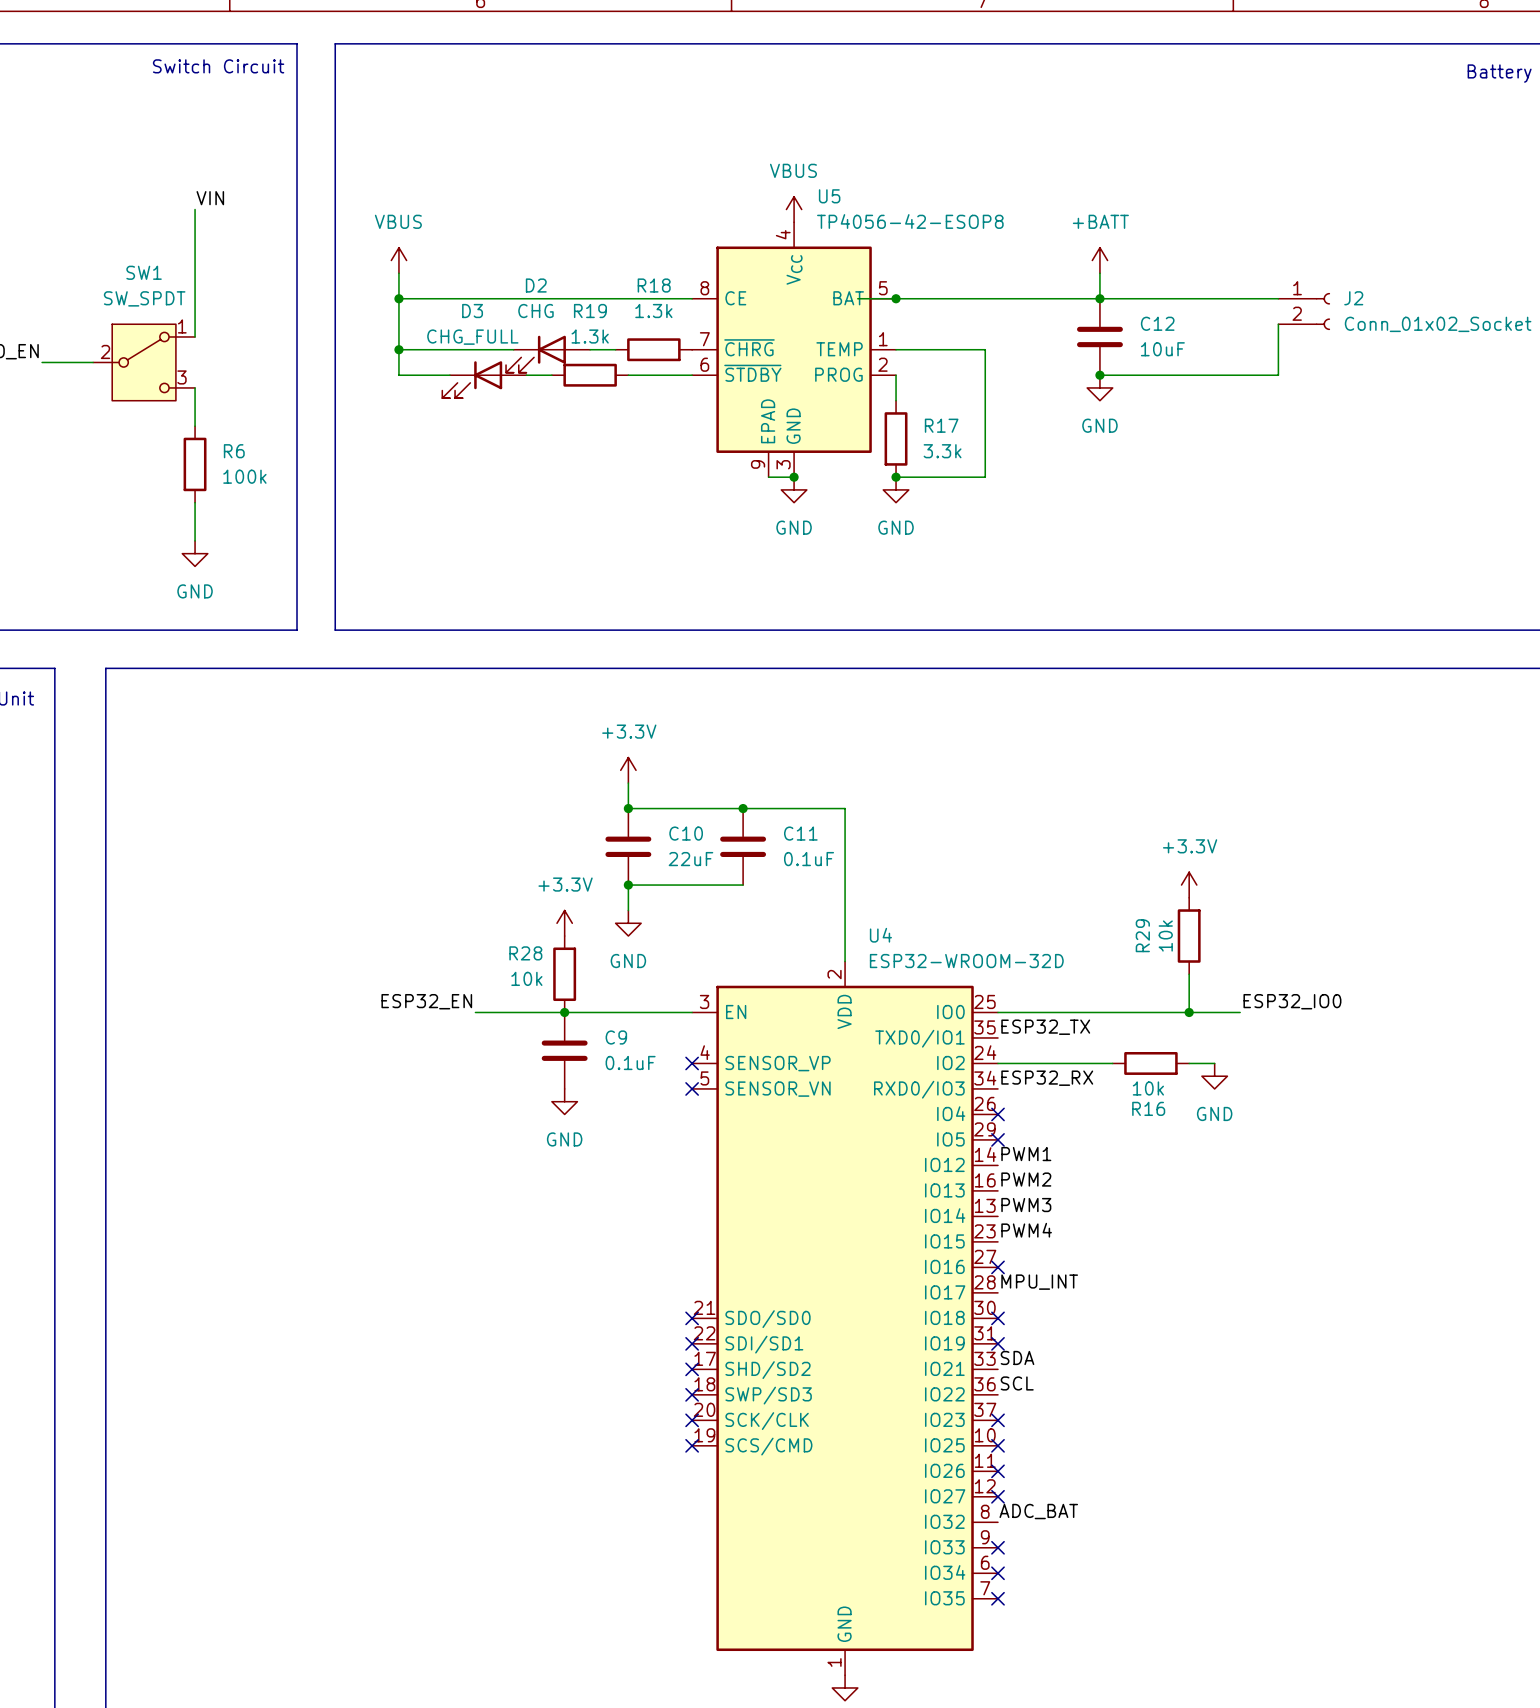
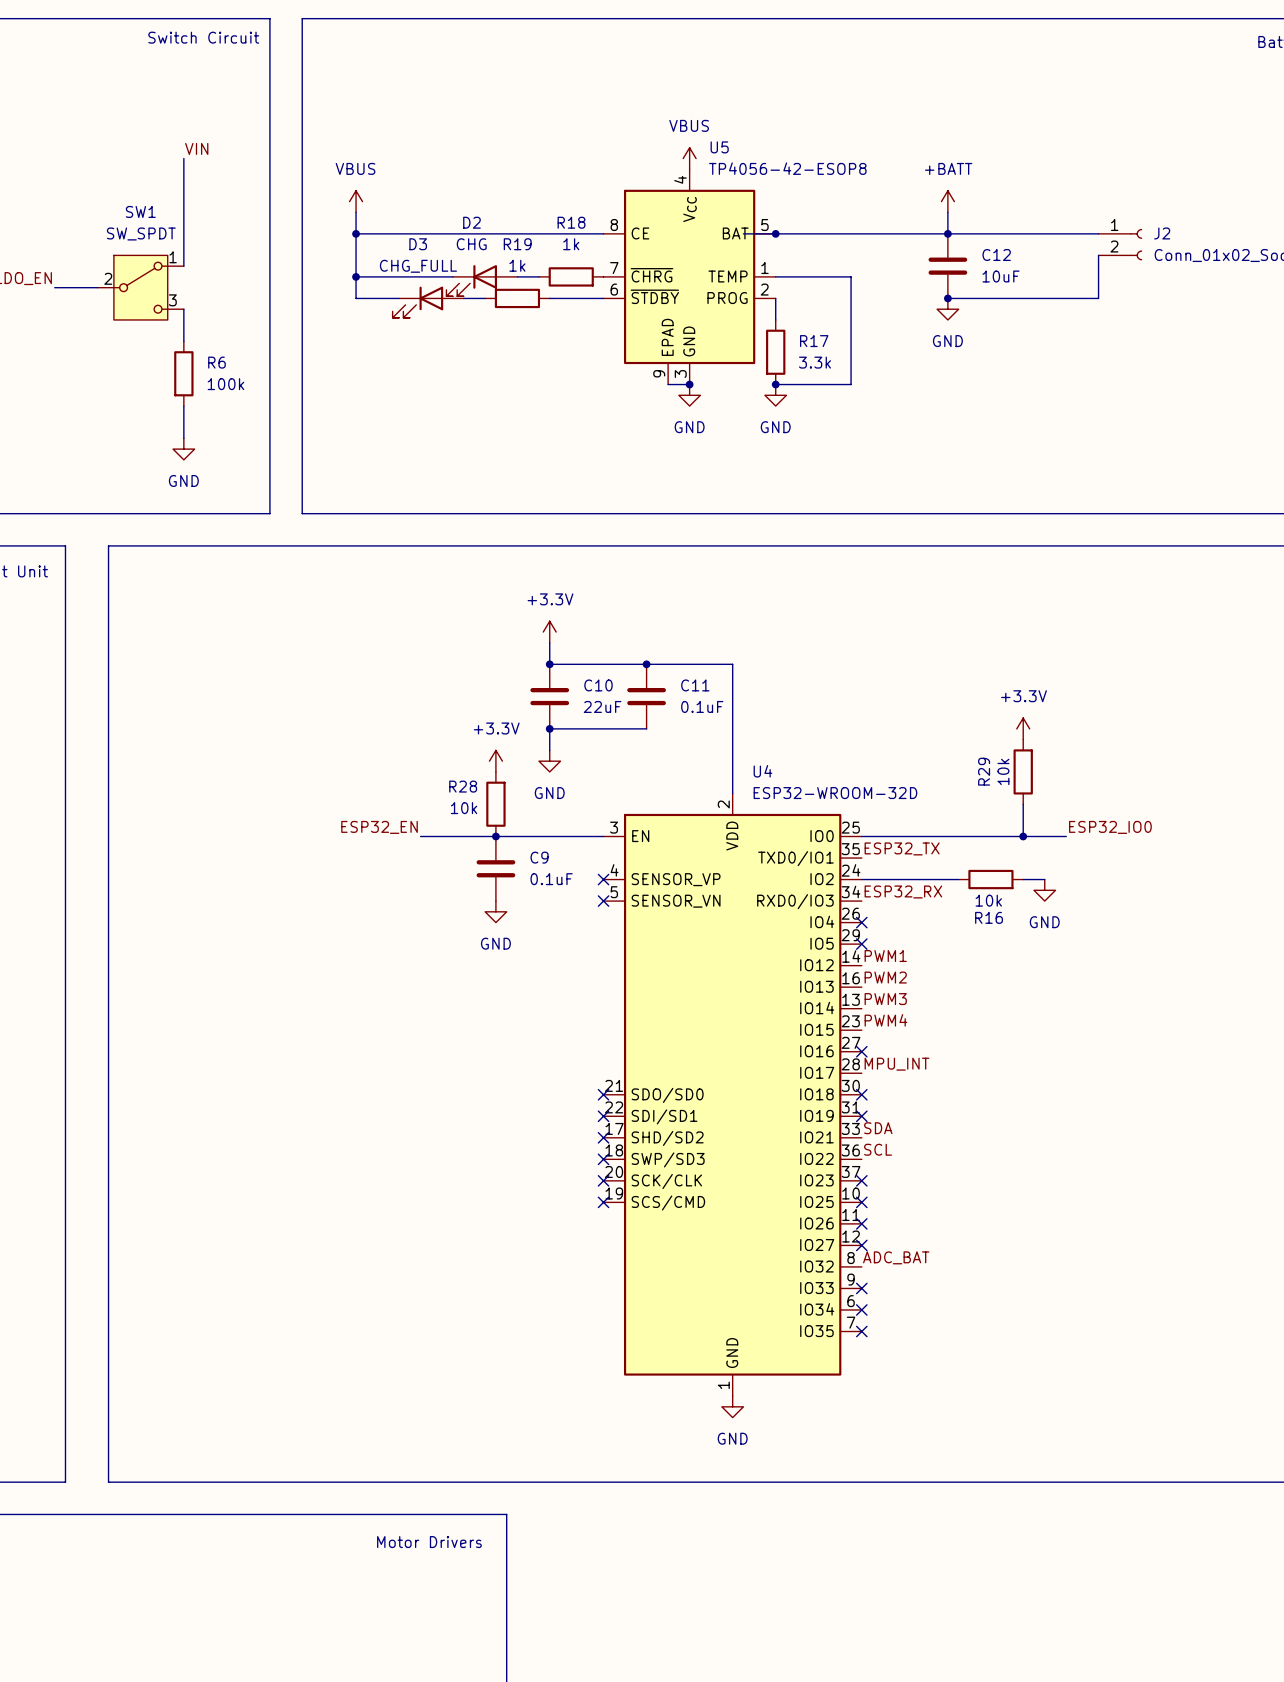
R18 value: 1.3k (653, 311) -> 1k (571, 244)
R19 value: 1.3k (590, 336) -> 1k (517, 265)

